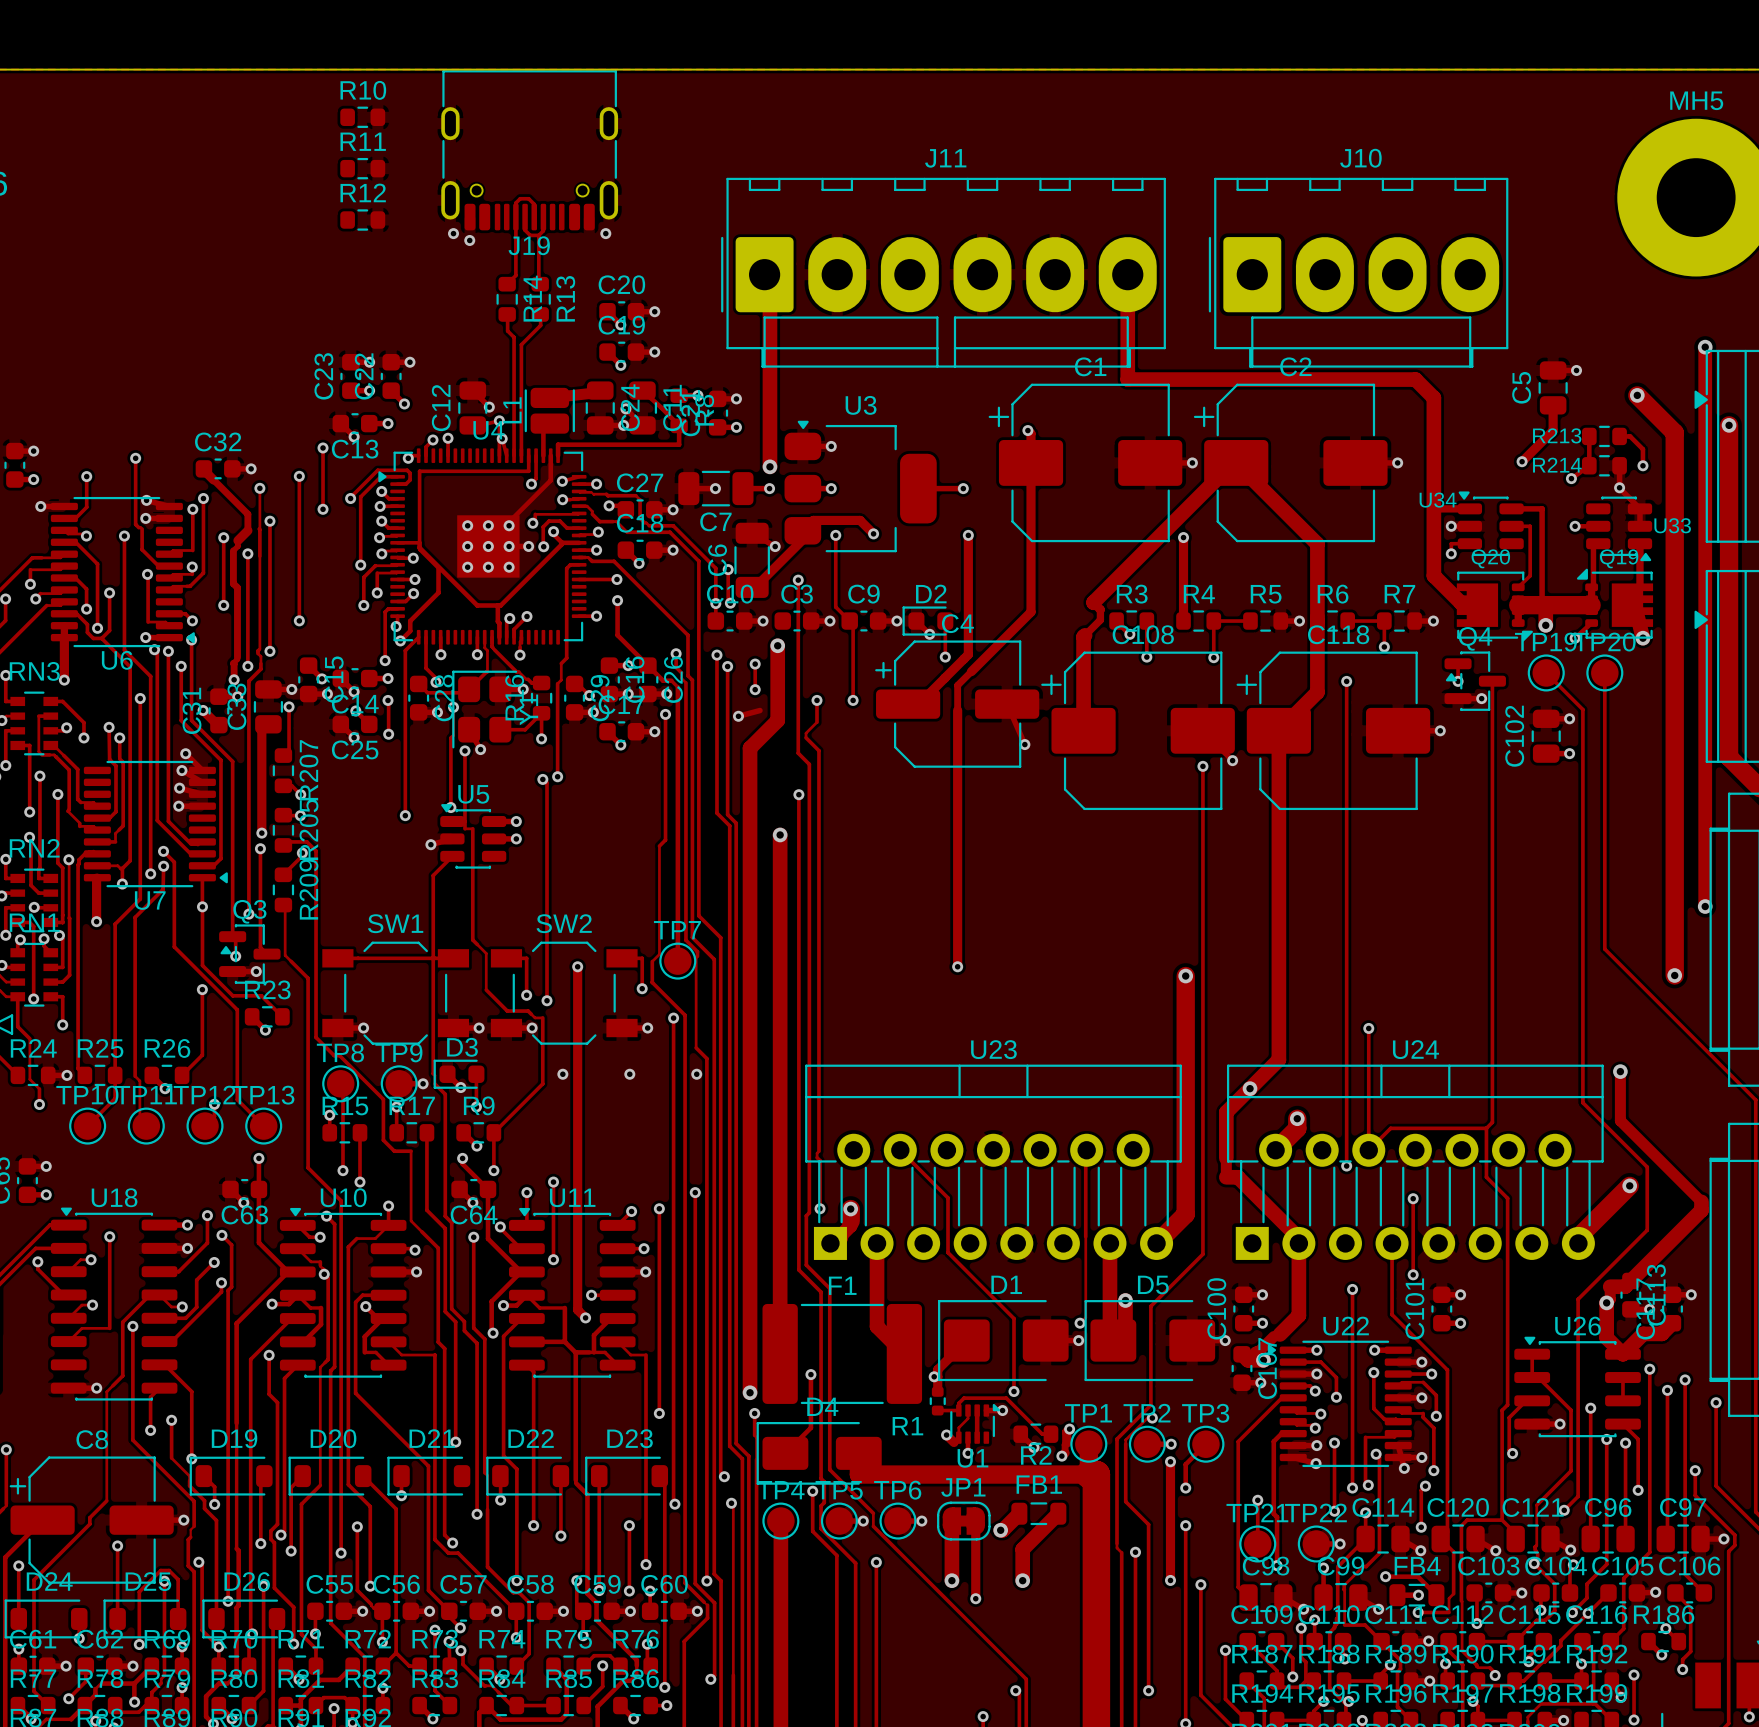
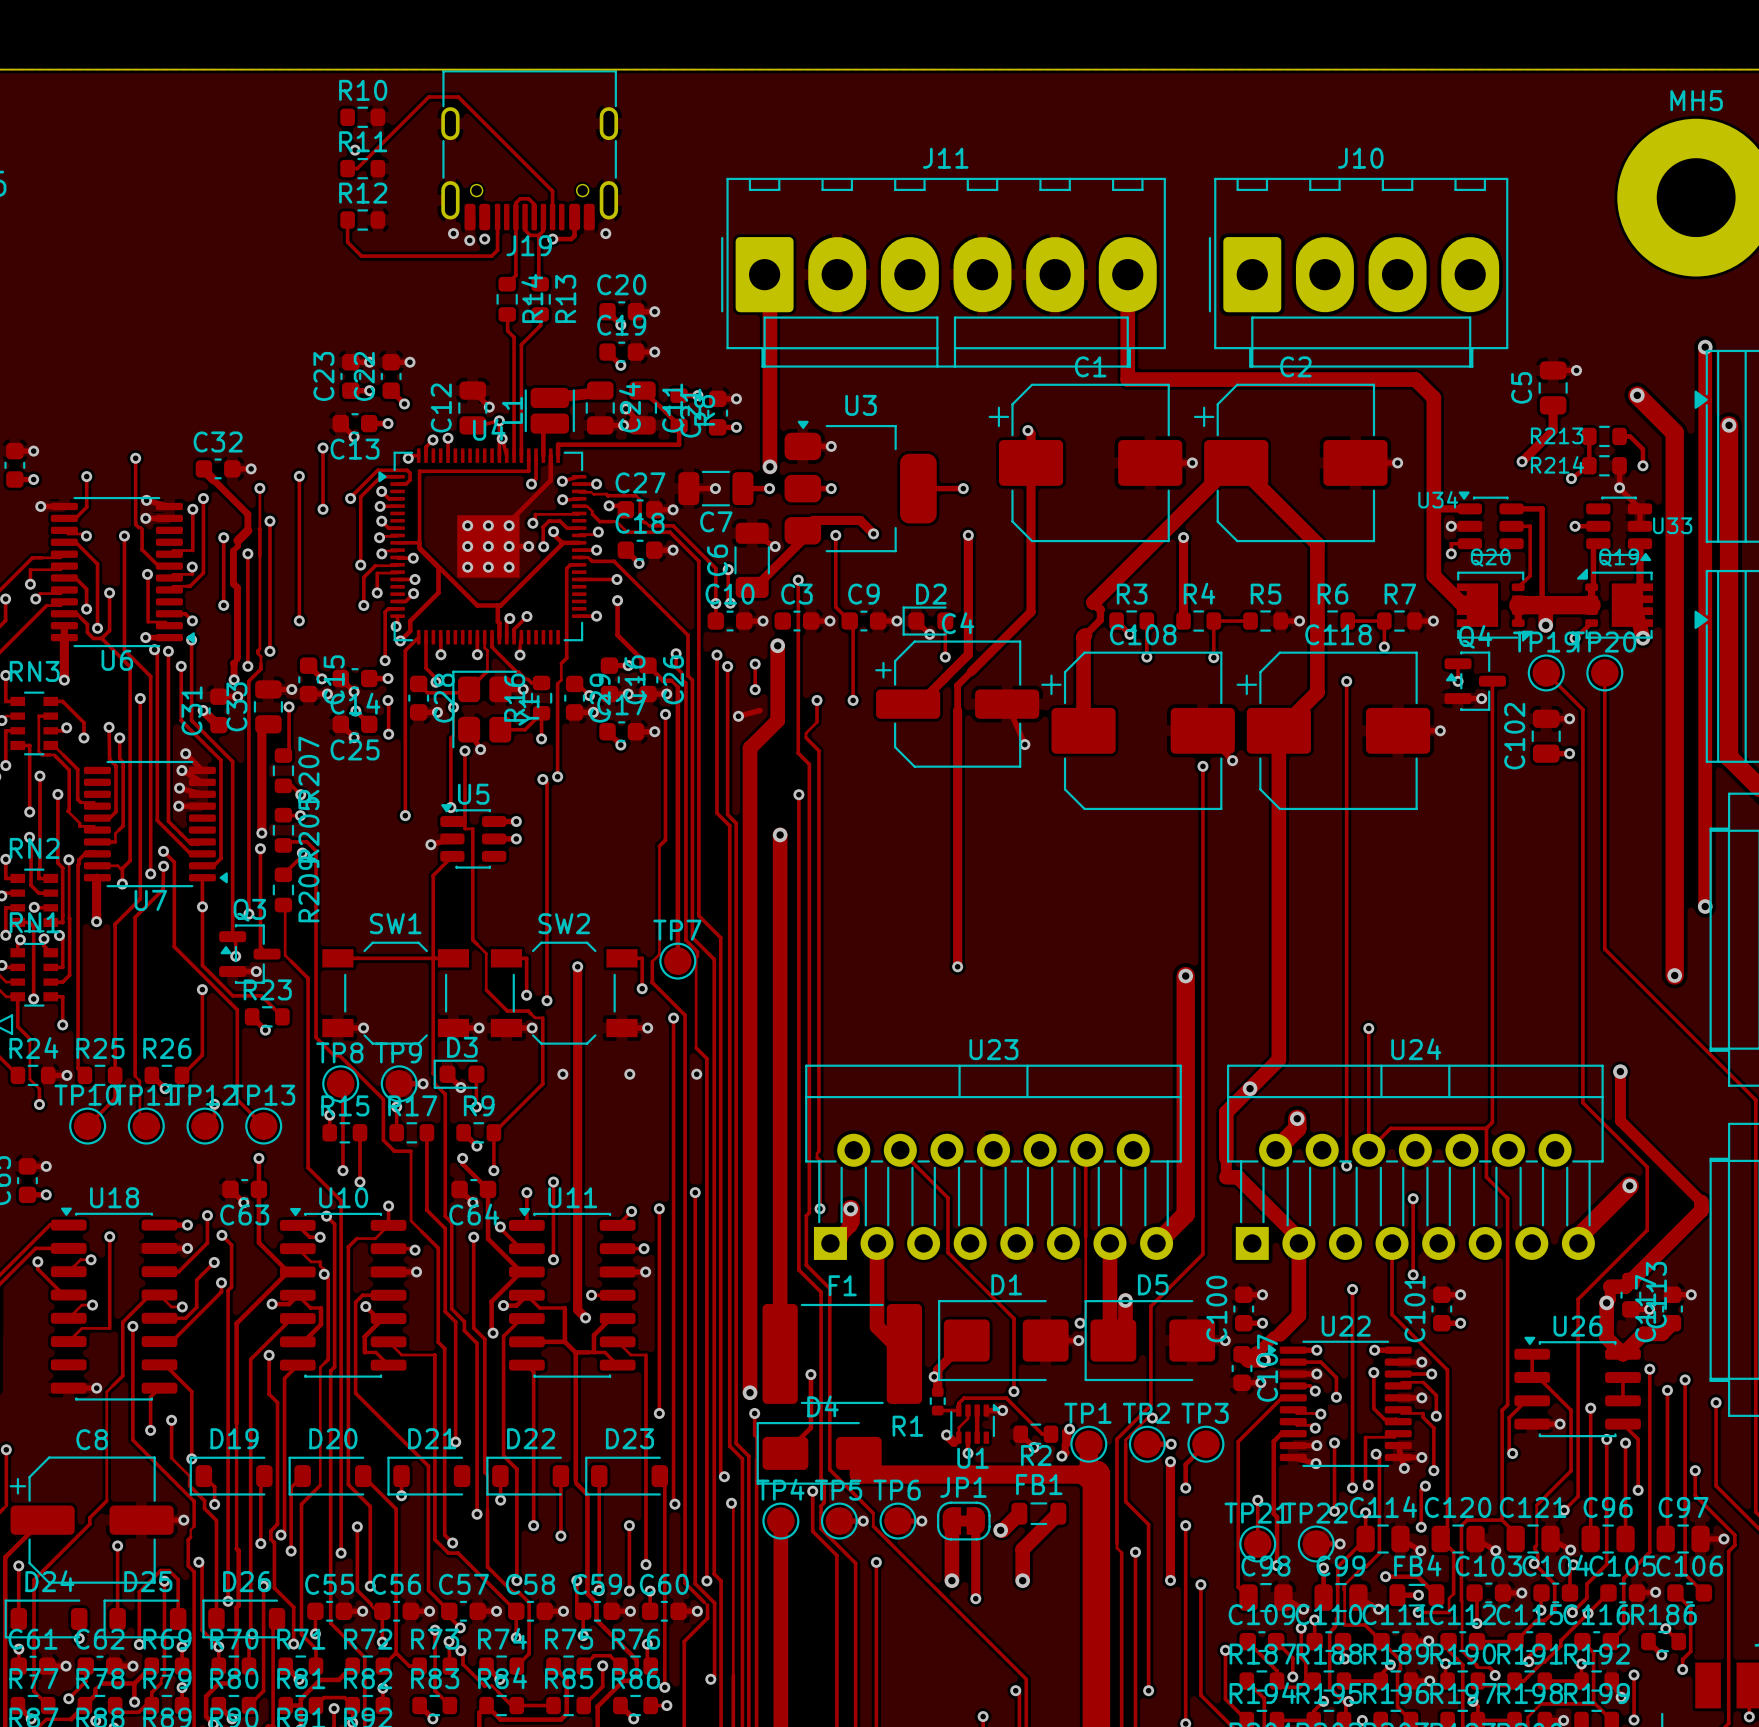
via: none -> (355, 150)
track: none -> (347, 168) (357, 168) (428, 97) (458, 97) (552, 191) (552, 217)
track: none -> (497, 217) (497, 250) (491, 256) (361, 256) (347, 242) (347, 220)
track: none -> (574, 217) (574, 235) (571, 239) (552, 239)
via: none -> (484, 239)
via: none -> (552, 239)

